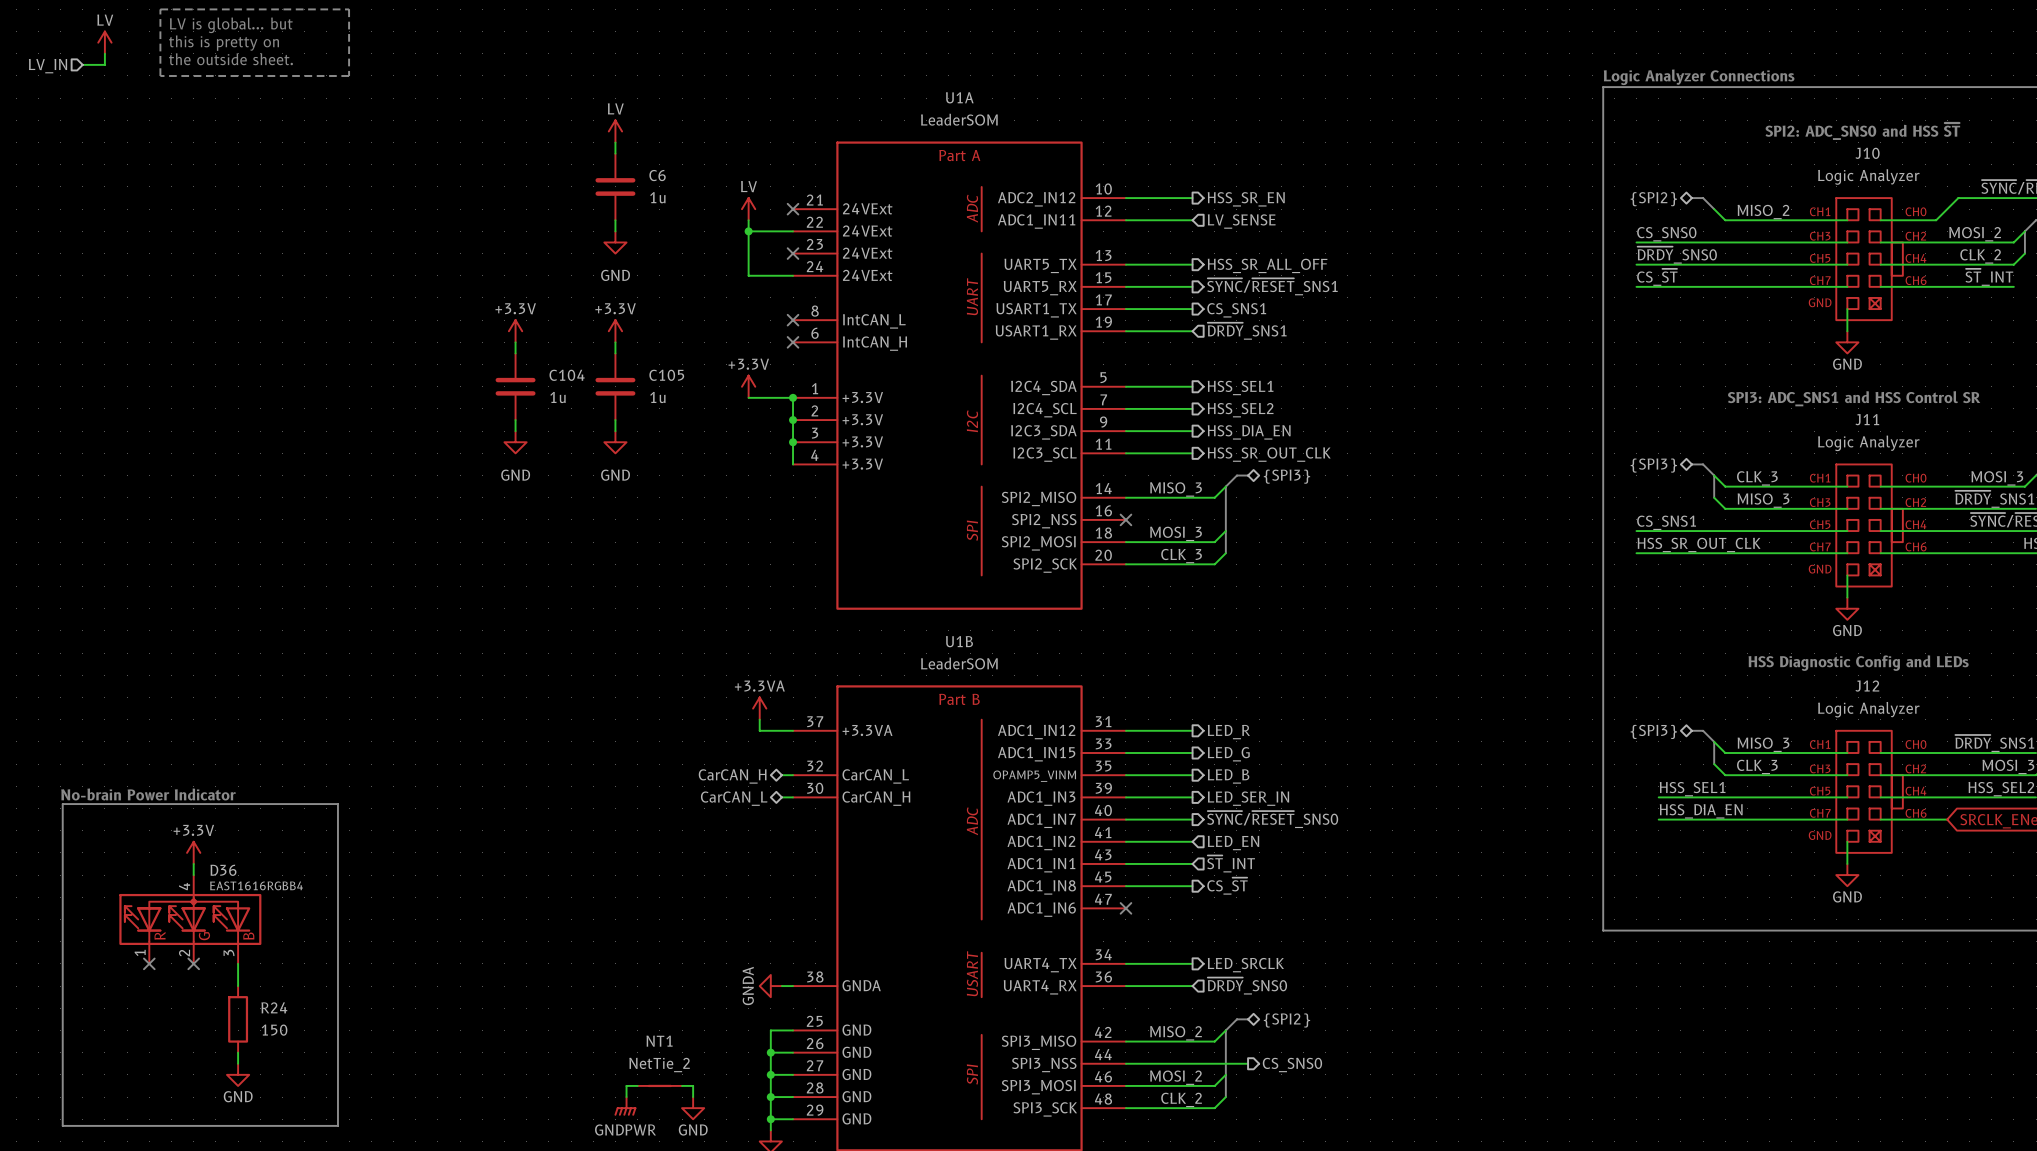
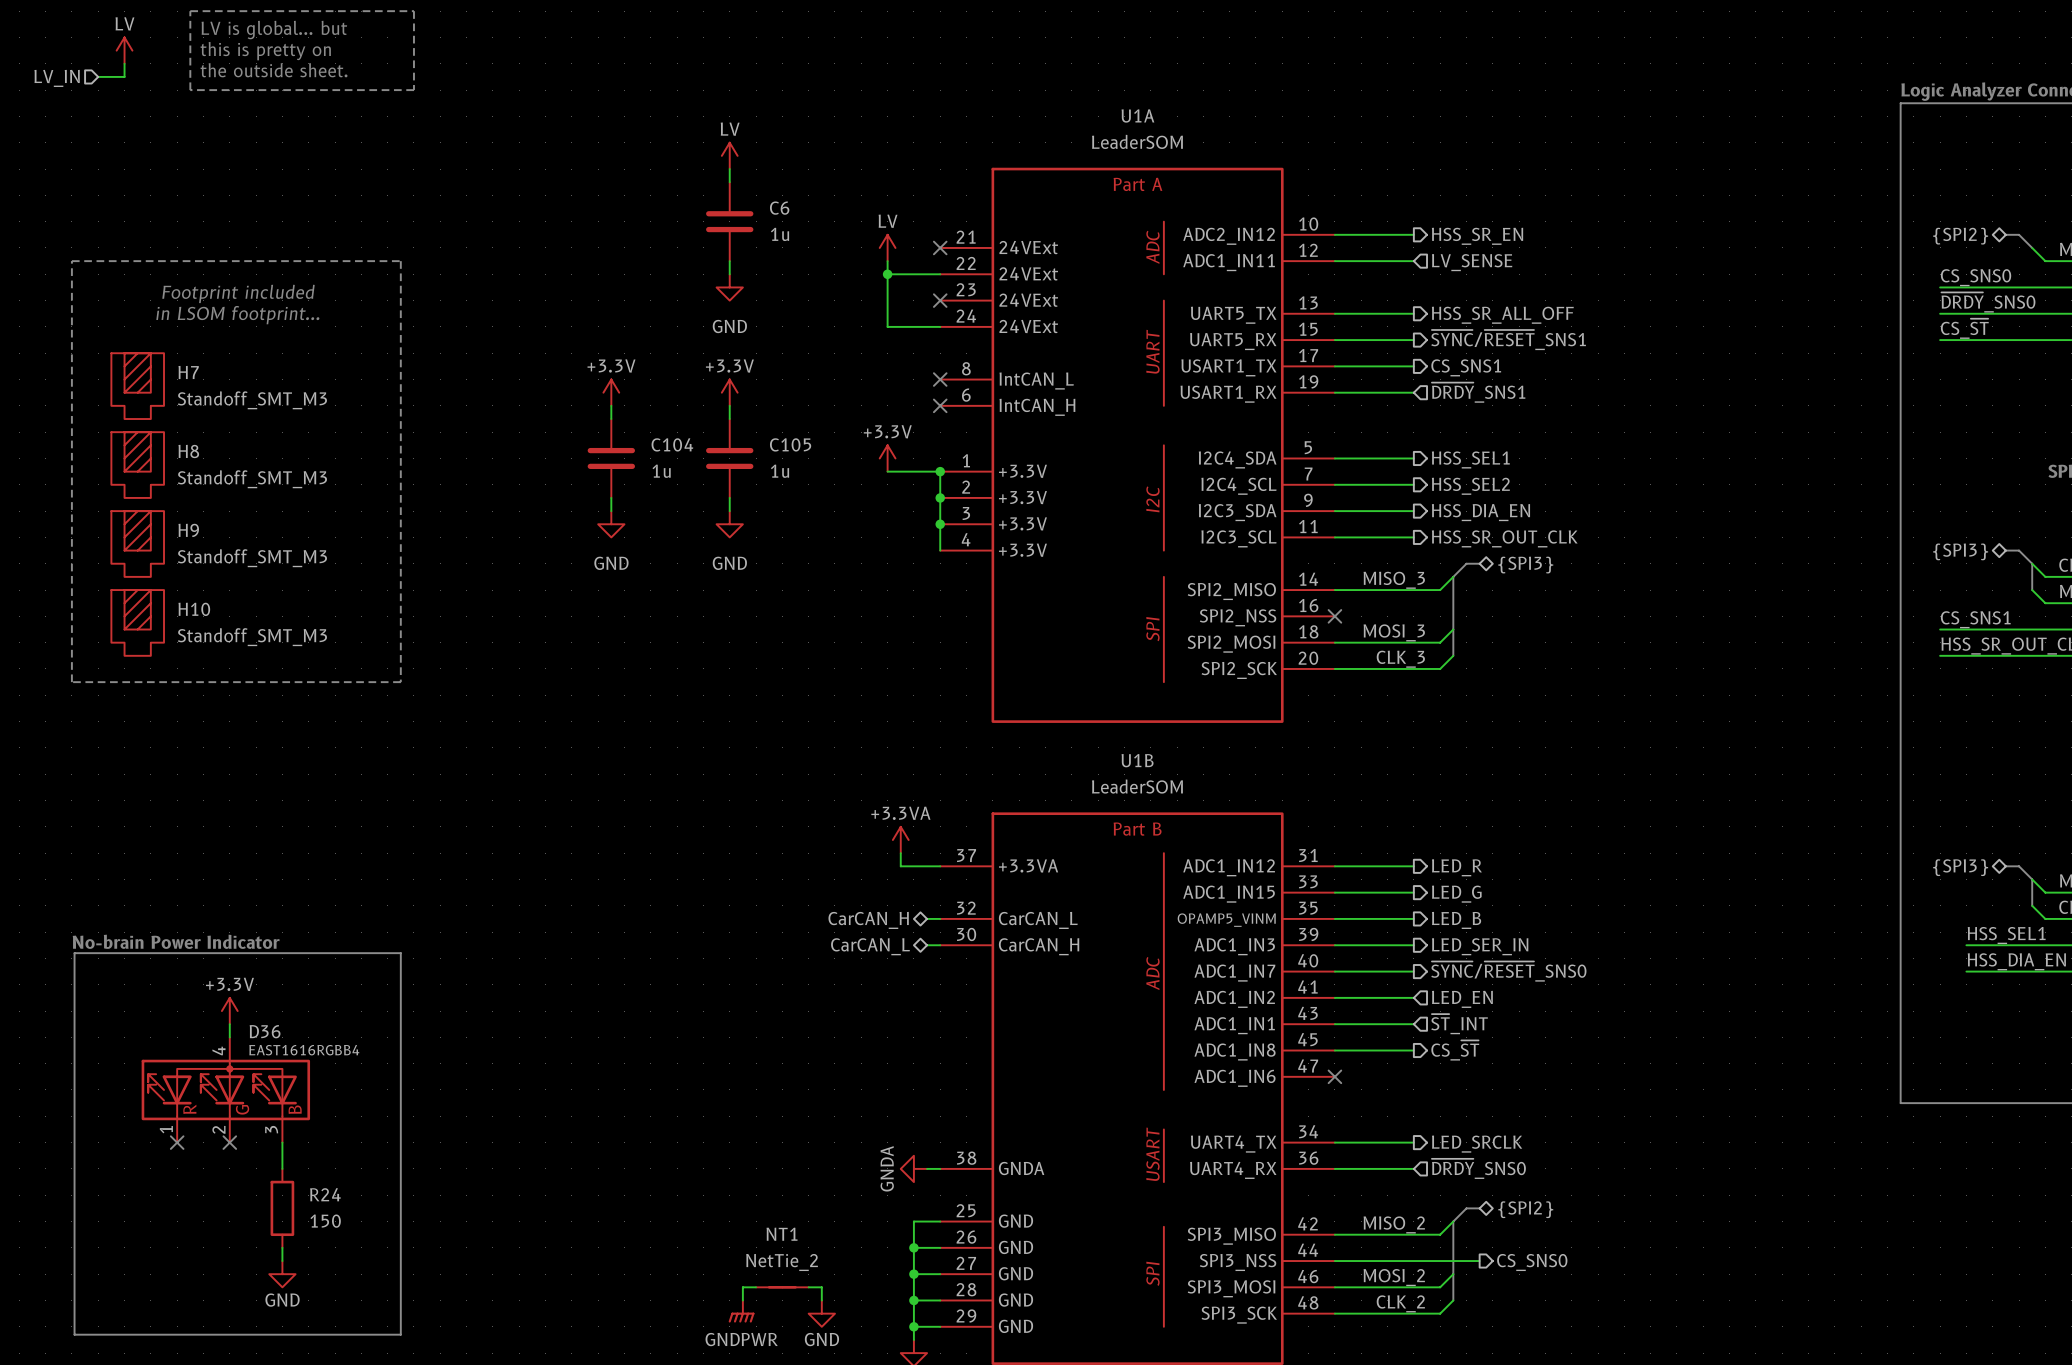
line: none -> (71, 261) (400, 261) (400, 682) (71, 682) (71, 261)
text: none -> Footprint included (238, 293)
text: none -> in LSOM footprint... (237, 315)
H7: none -> Standoff_SMT_M3 (137, 386)
H8: none -> Standoff_SMT_M3 (137, 465)
H9: none -> Standoff_SMT_M3 (137, 543)
H10: none -> Standoff_SMT_M3 (137, 622)

